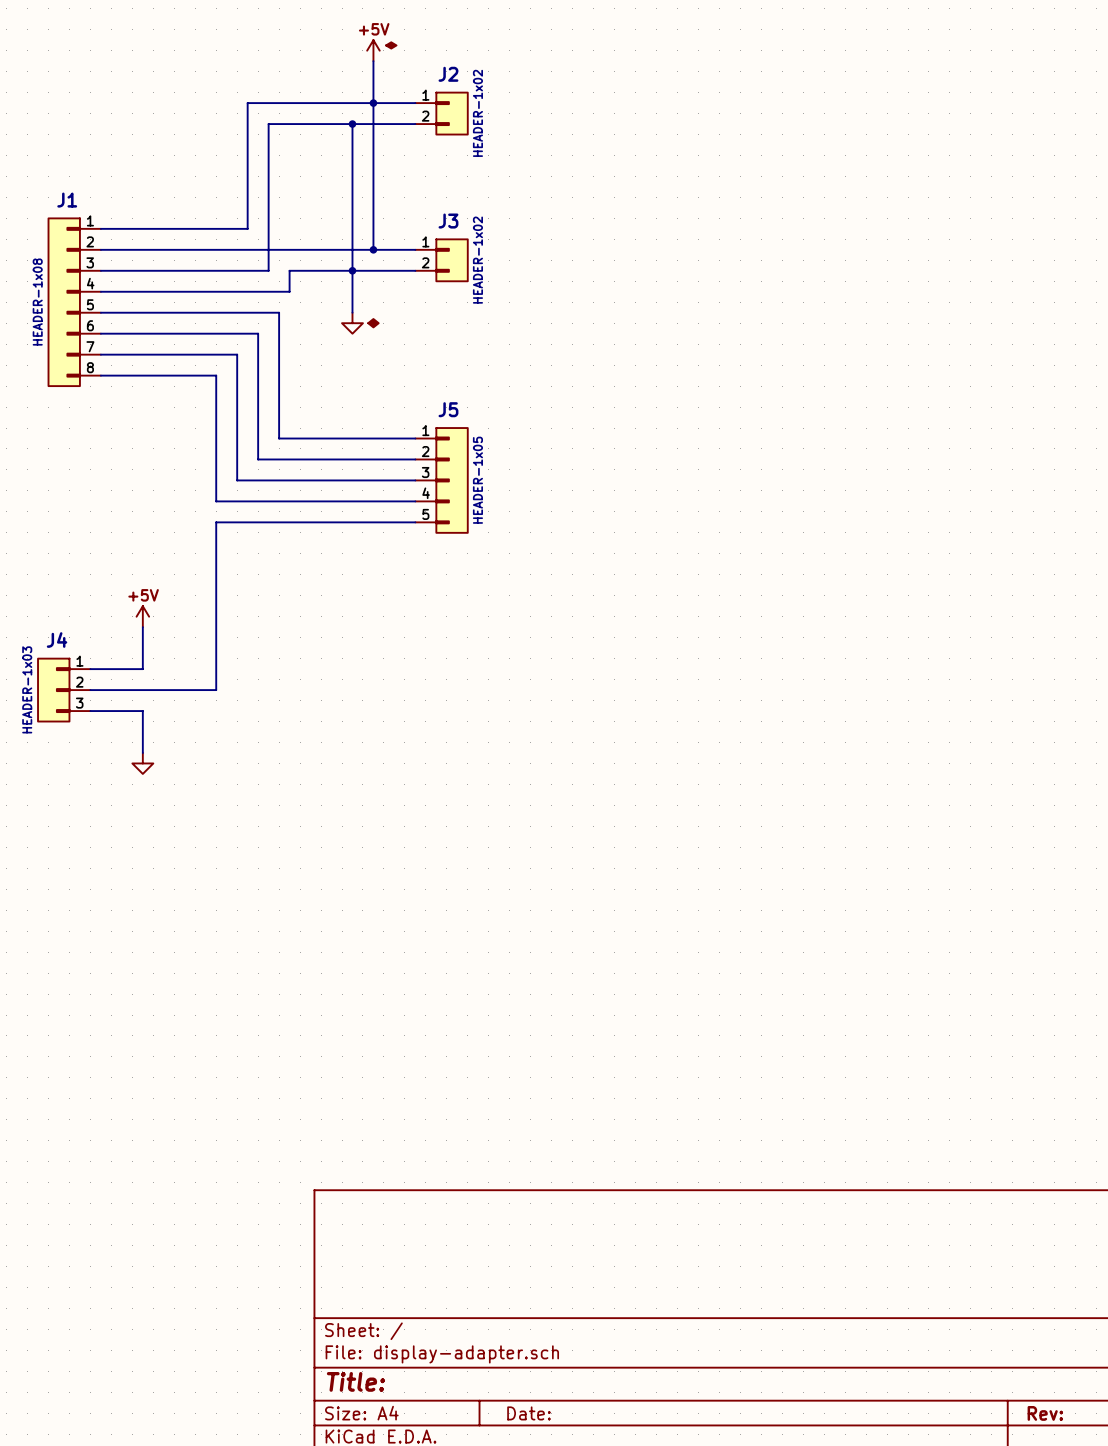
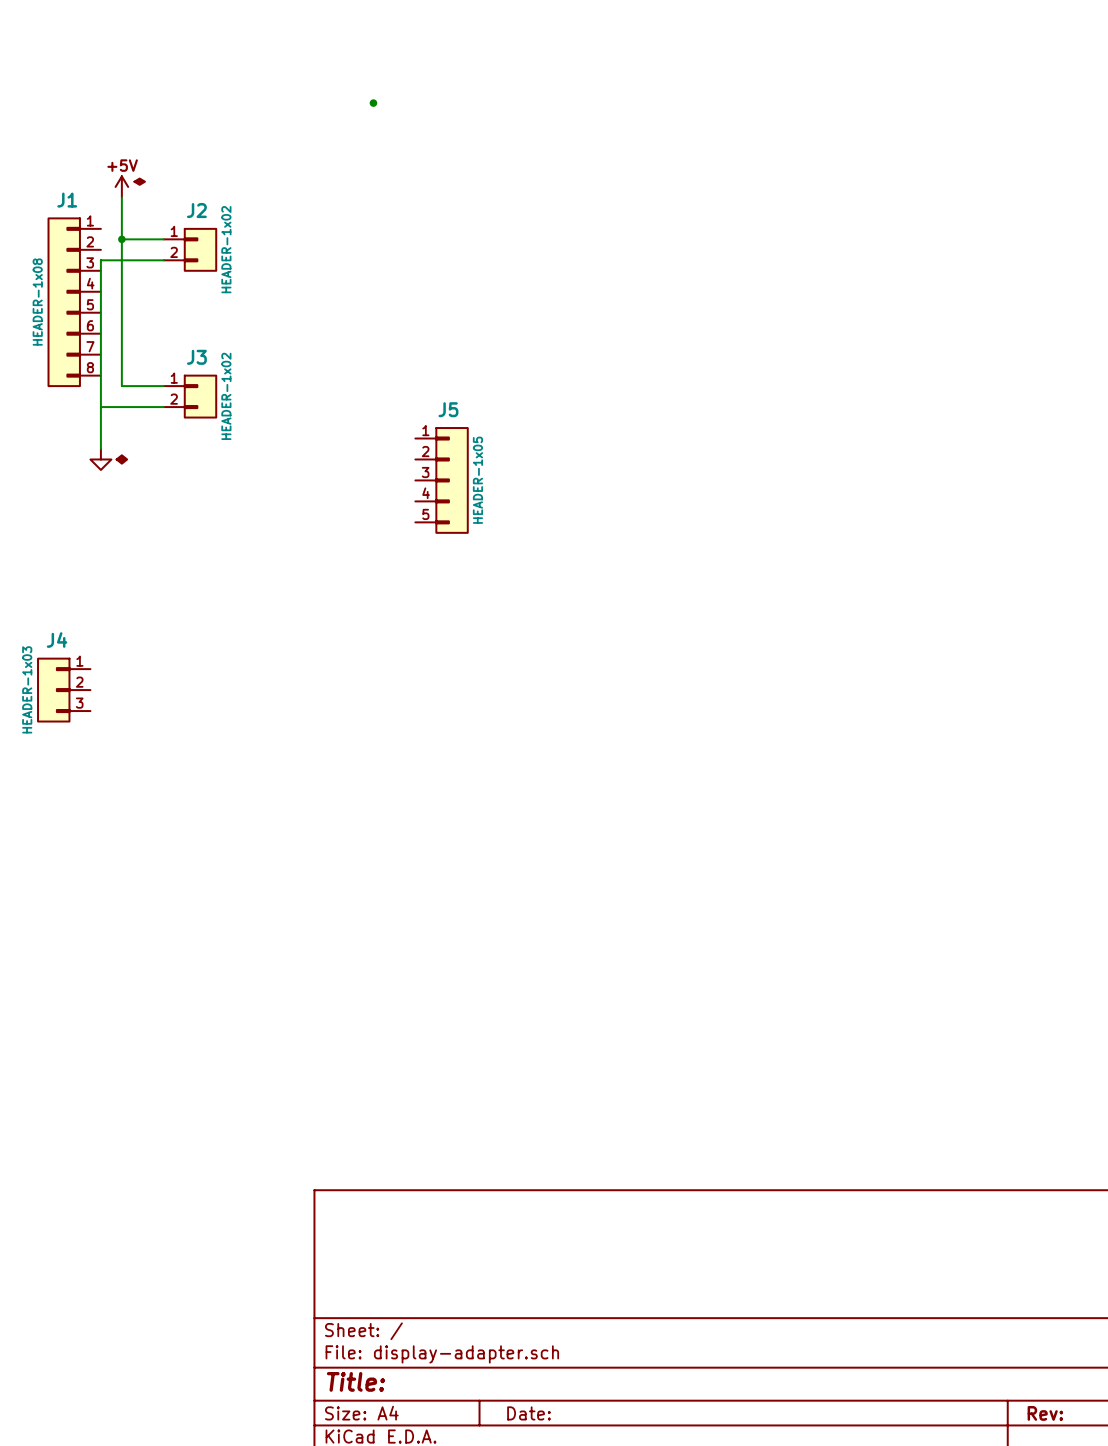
power symbol: (381, 50) -> none
wire: (373, 61) (373, 249) -> none
wire: (415, 103) (247, 103) (247, 228) (100, 228) -> none
J2 position: (441, 113) -> (190, 249)
wire: (352, 124) (352, 312) -> none
junction: (352, 124) -> none
wire: (415, 124) (268, 124) (268, 270) (100, 270) -> none
power symbol: none -> (130, 186)
wire: none -> (121, 197) (121, 386) (163, 386)
wire: none -> (121, 239) (163, 239)
junction: none -> (121, 239)
wire: (100, 249) (415, 249) -> none
junction: (373, 249) -> none
wire: none -> (163, 260) (100, 260) (100, 448)
J3 position: (441, 260) -> (190, 396)
junction: (352, 270) -> none
wire: (415, 270) (289, 270) (289, 291) (100, 291) -> none
wire: (100, 312) (279, 312) (279, 438) (415, 438) -> none
power symbol: (360, 323) -> none
wire: (100, 333) (258, 333) (258, 459) (415, 459) -> none
wire: (100, 354) (237, 354) (237, 480) (415, 480) -> none
wire: (100, 375) (216, 375) (216, 501) (415, 501) -> none
wire: none -> (100, 407) (163, 407)
power symbol: none -> (108, 459)
wire: (415, 522) (216, 522) (216, 690) (90, 690) -> none
power symbol: (142, 616) -> none
wire: (142, 627) (142, 669) (90, 669) -> none
wire: (90, 711) (142, 711) (142, 752) -> none
power symbol: (142, 763) -> none

